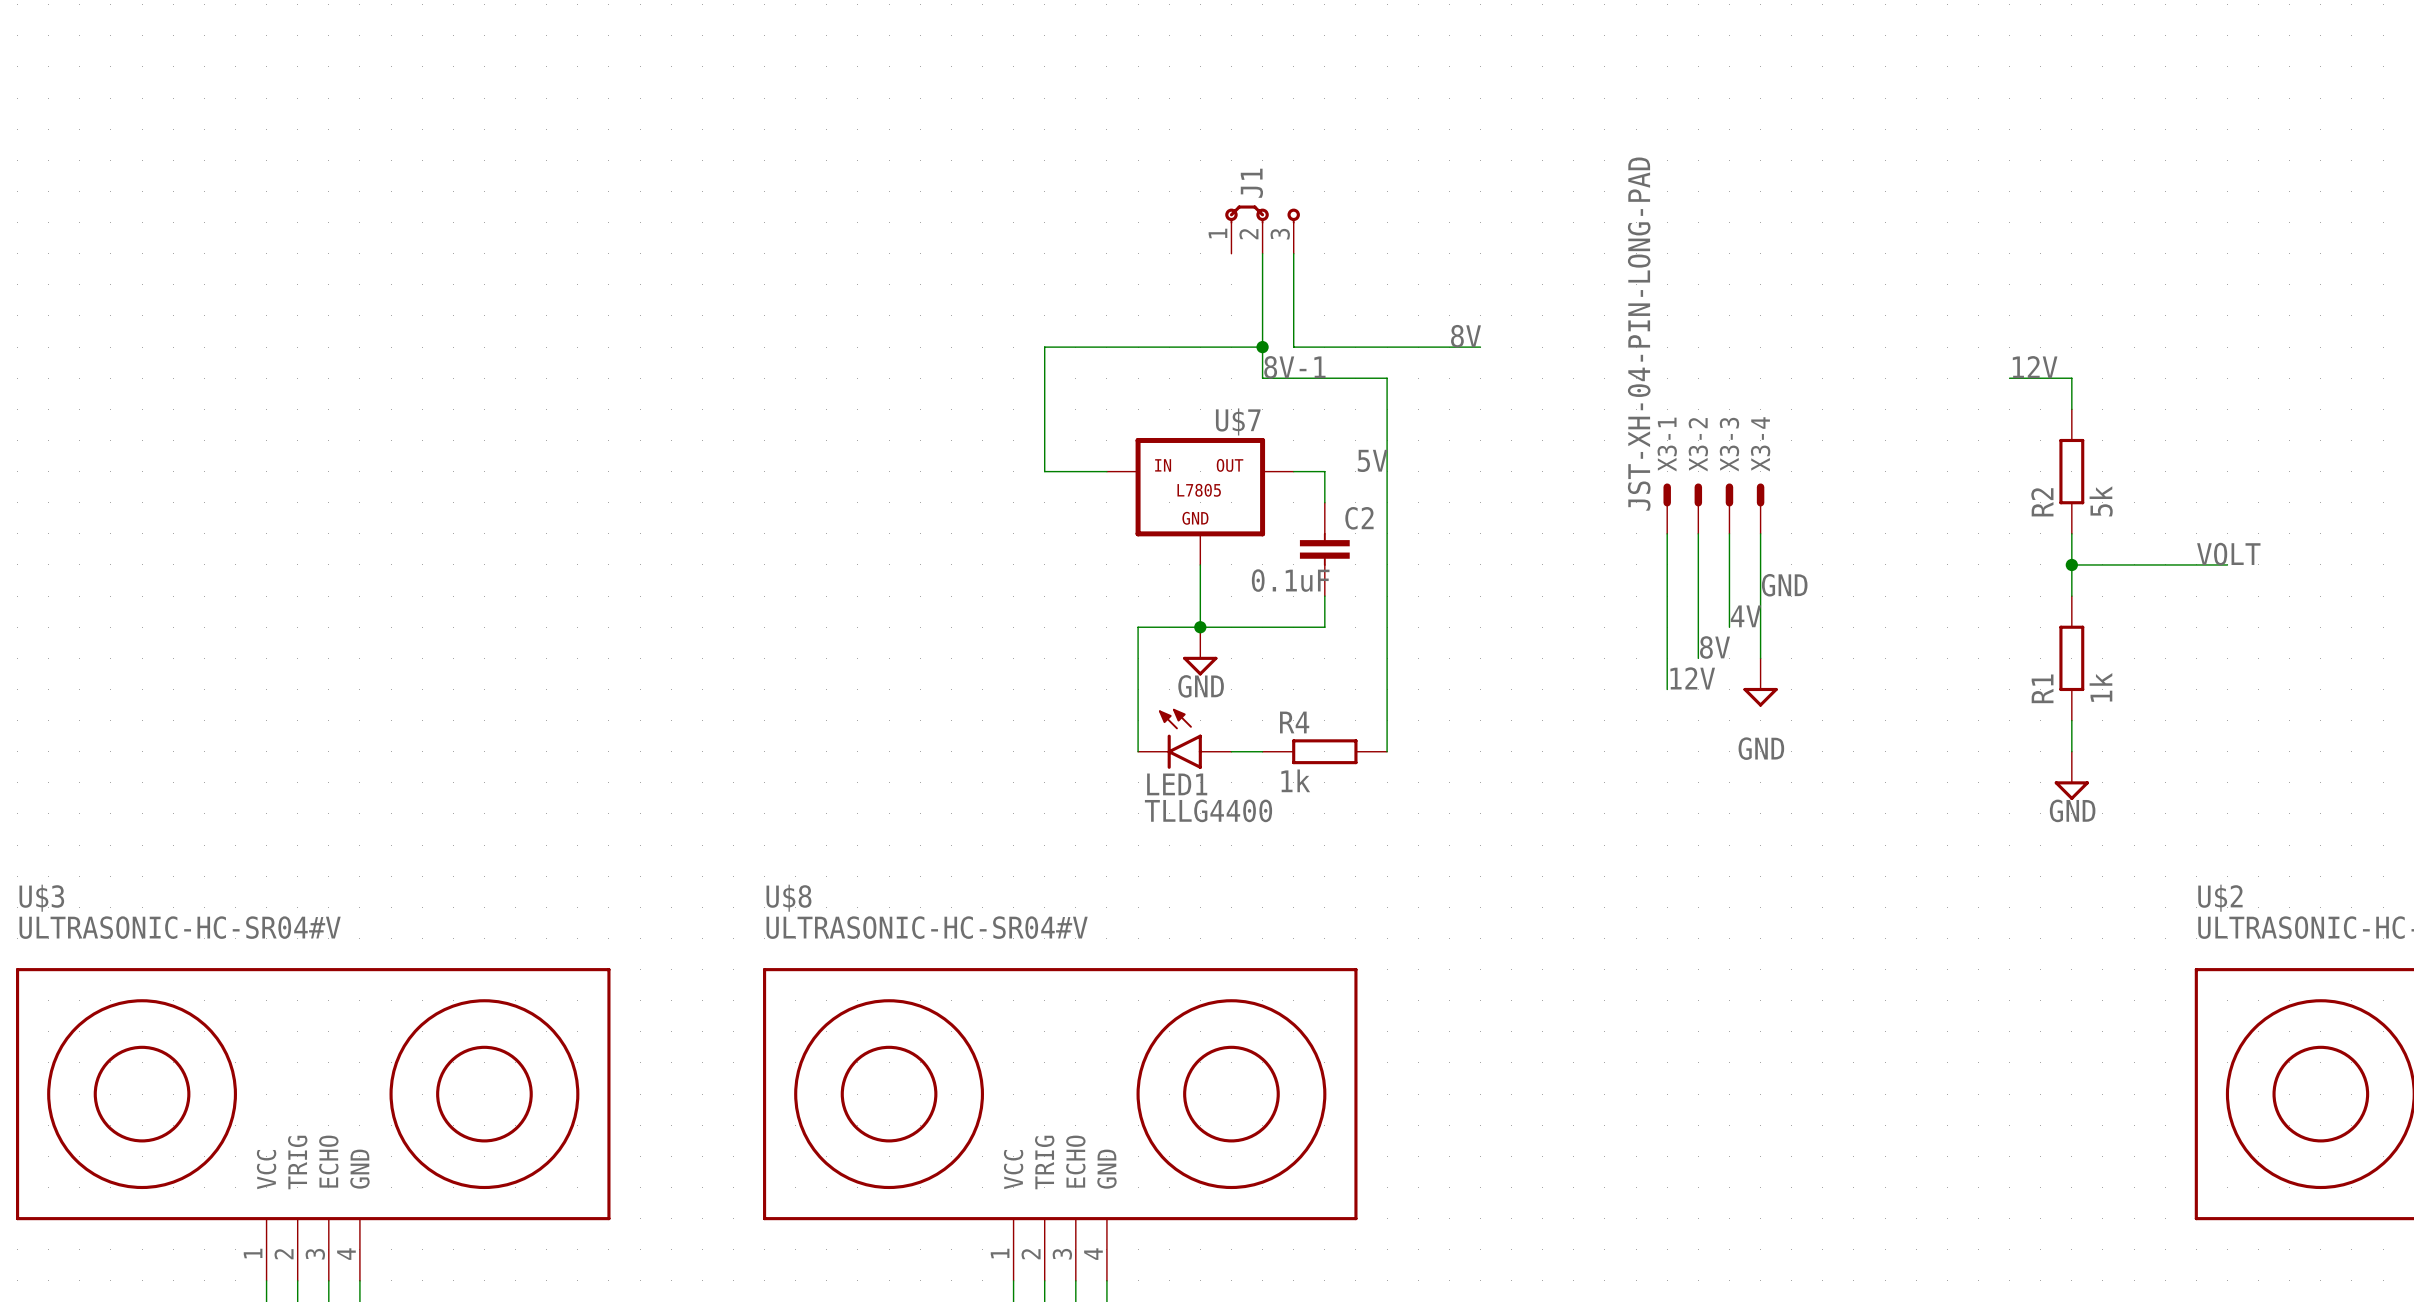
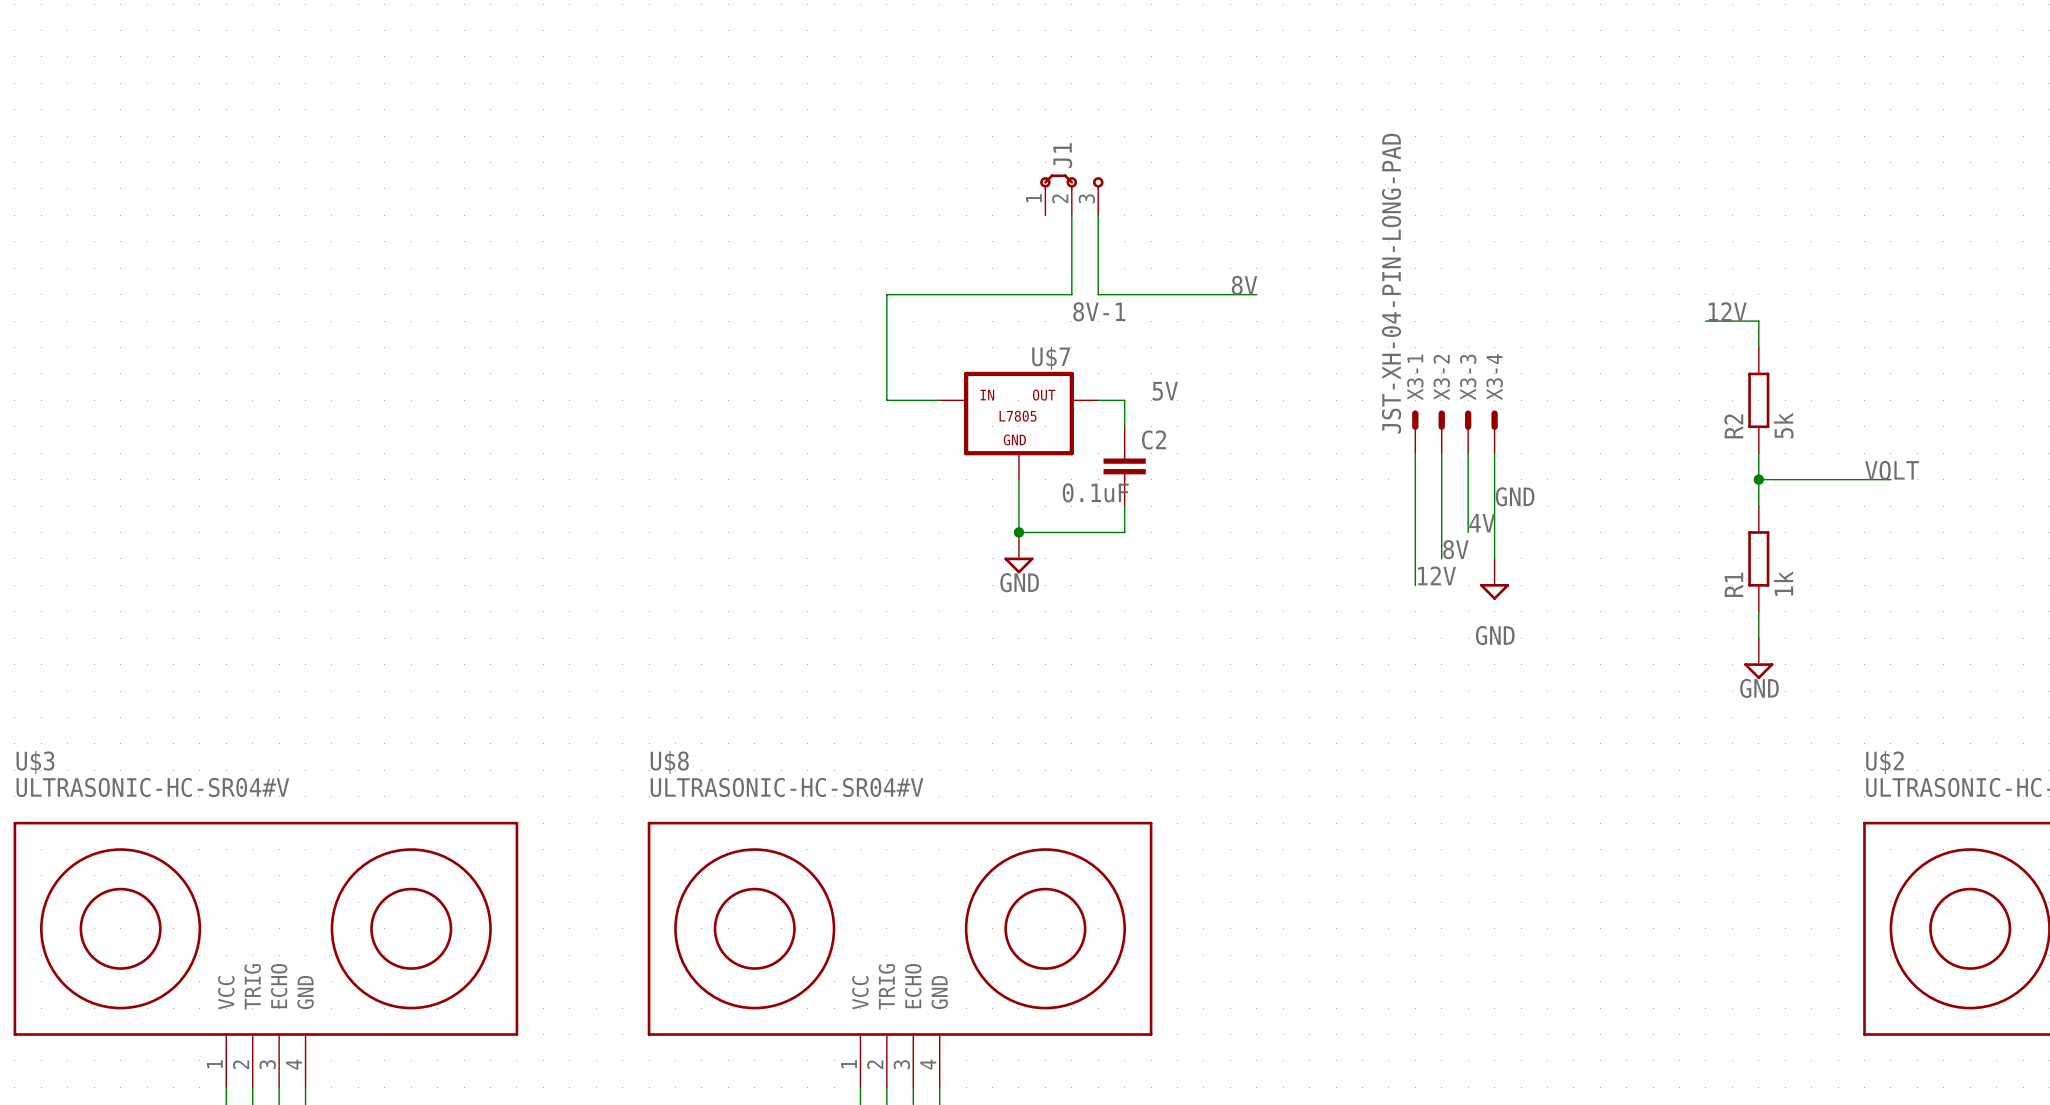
wire: (1262, 347) (1262, 378) (1387, 378) (1387, 751) -> none
junction: (1262, 347) -> none
wire: (1200, 627) (1138, 627) (1138, 751) -> none
LED1: TLLG4400 (1184, 738) -> none
wire: (1231, 751) (1262, 751) -> none
R4: 1k (1324, 751) -> none

